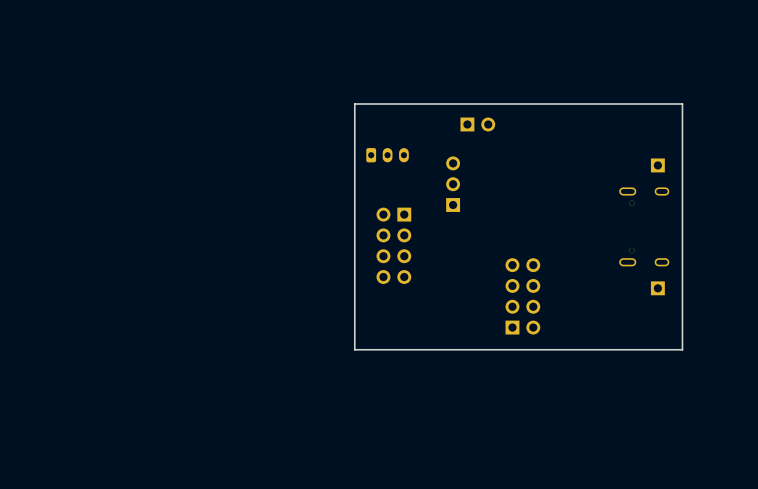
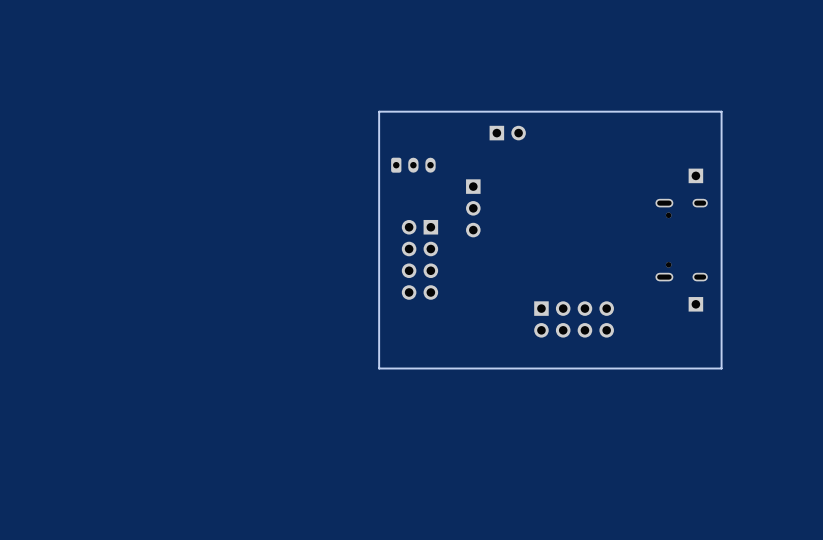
part rotation: 0° (453, 184) -> 180° (473, 208)
part rotation: 0° (522, 296) -> 90° clockwise (574, 319)

